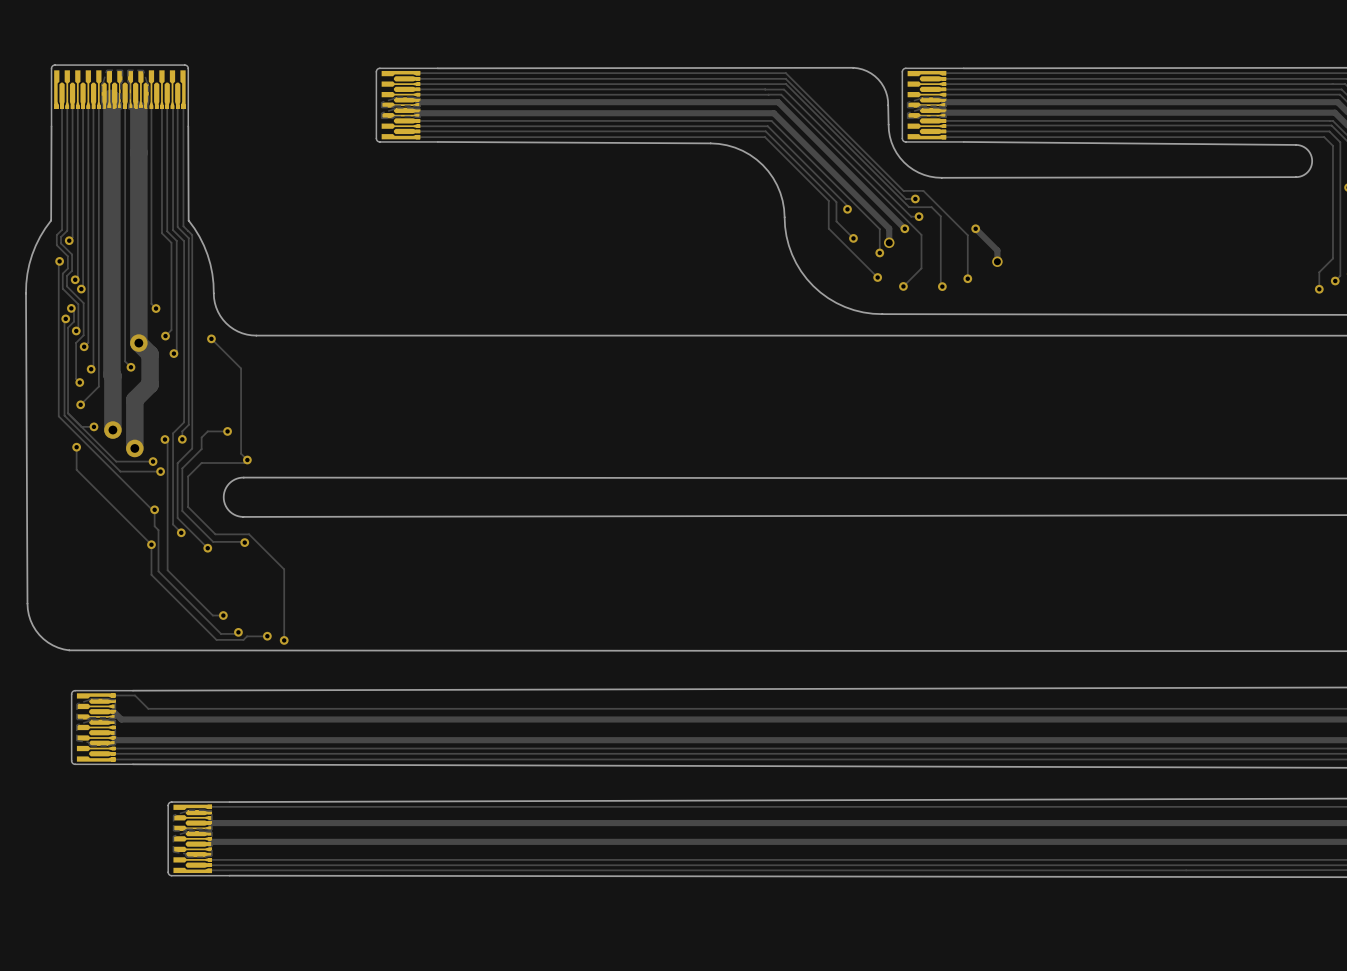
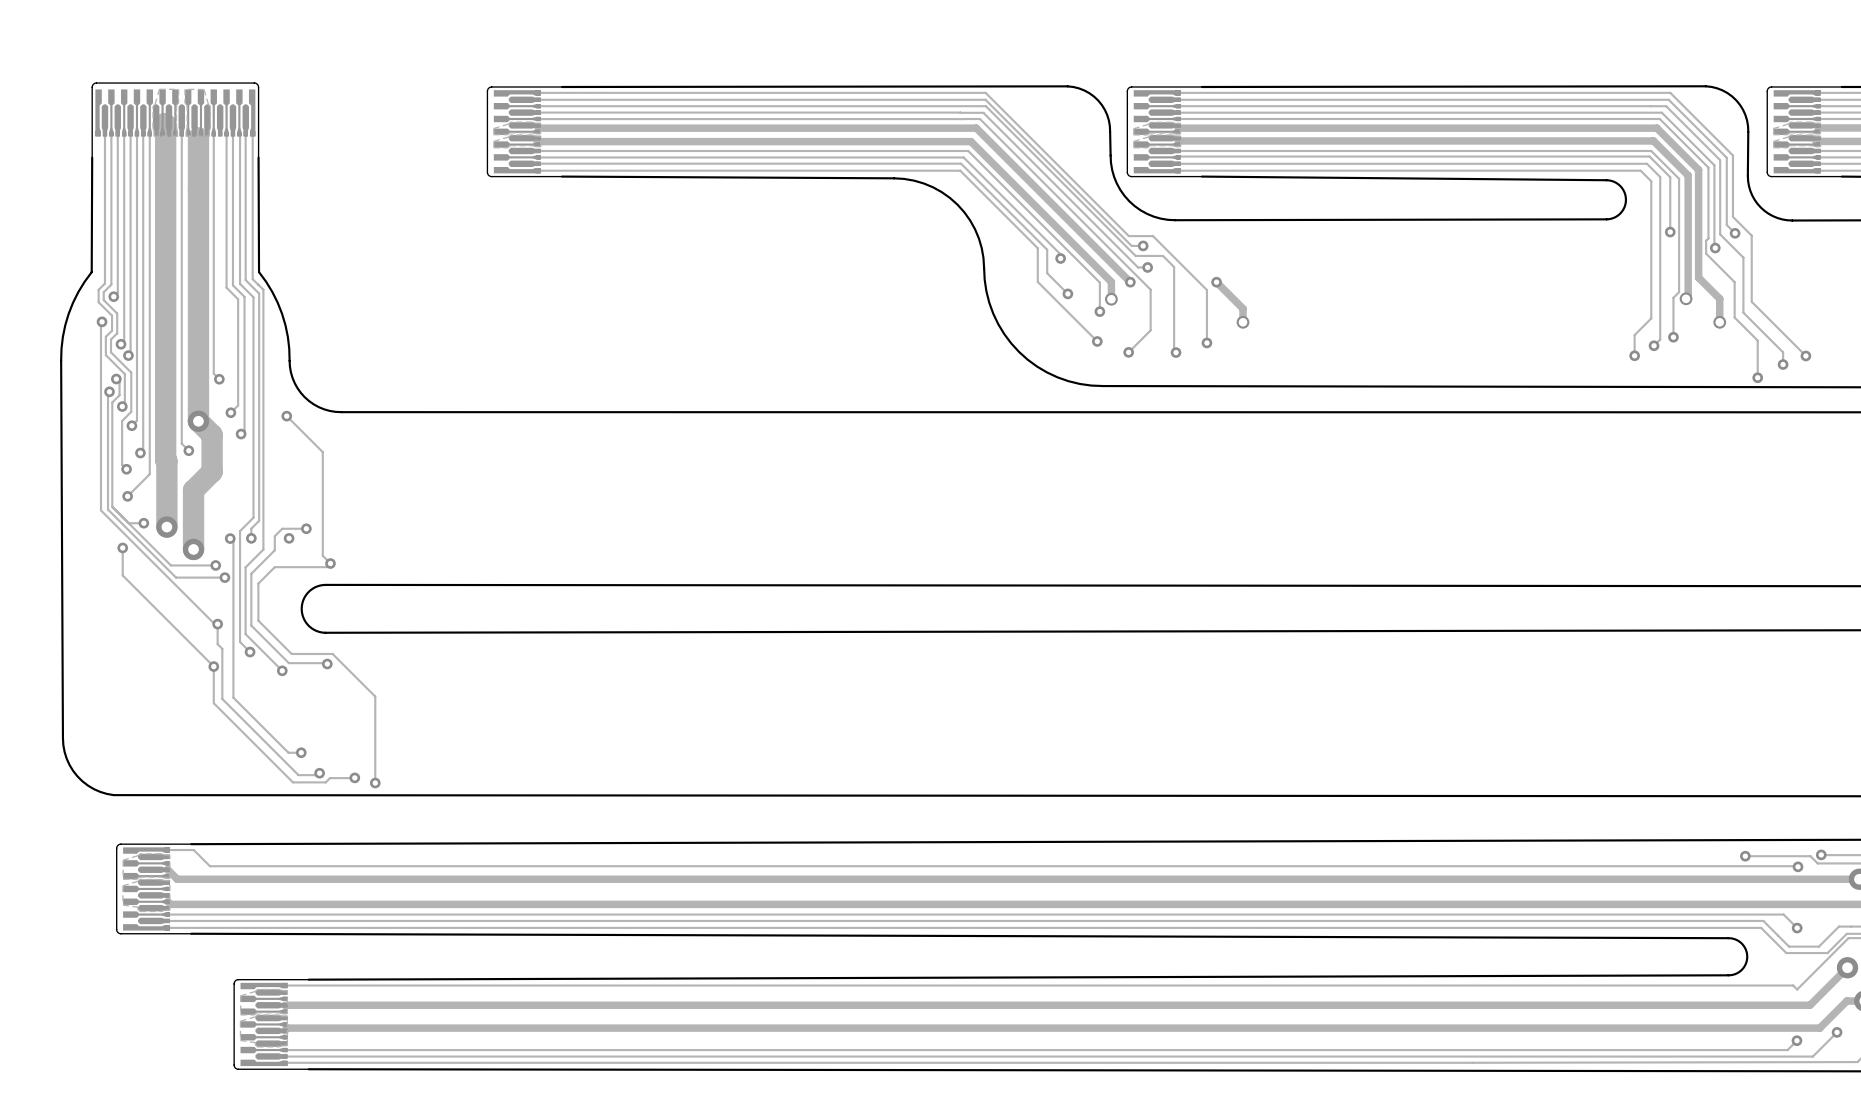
via: none -> (289, 538)

